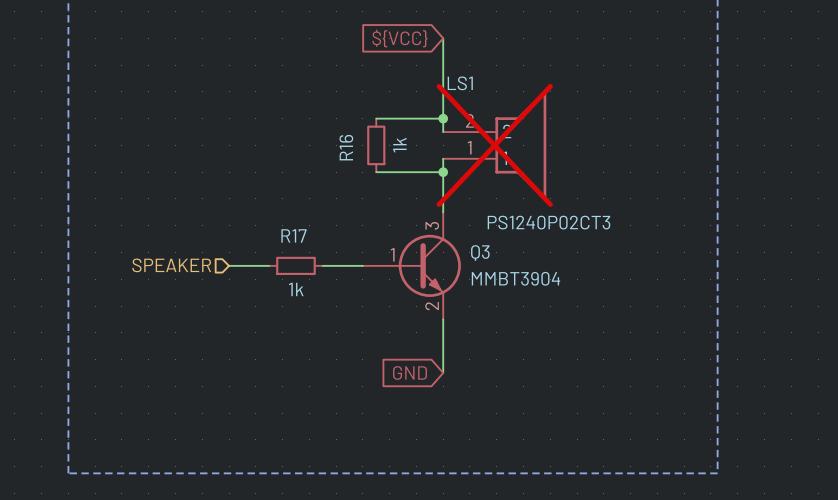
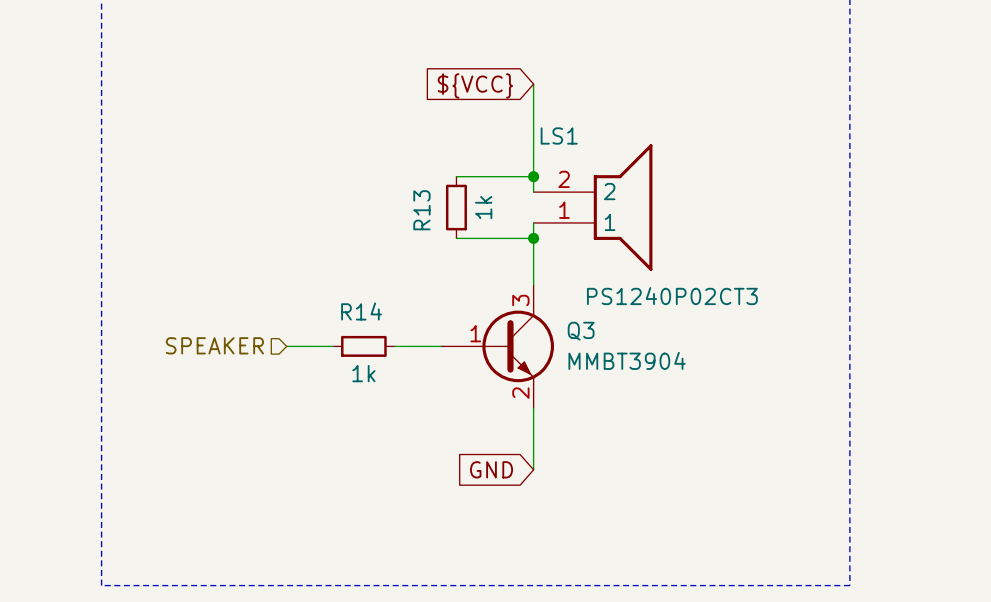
LS1 do-not-place cross: (494, 145) -> none
R16 name: R16 (346, 147) -> R13 (421, 210)
R17 name: R17 (293, 235) -> R14 (361, 311)

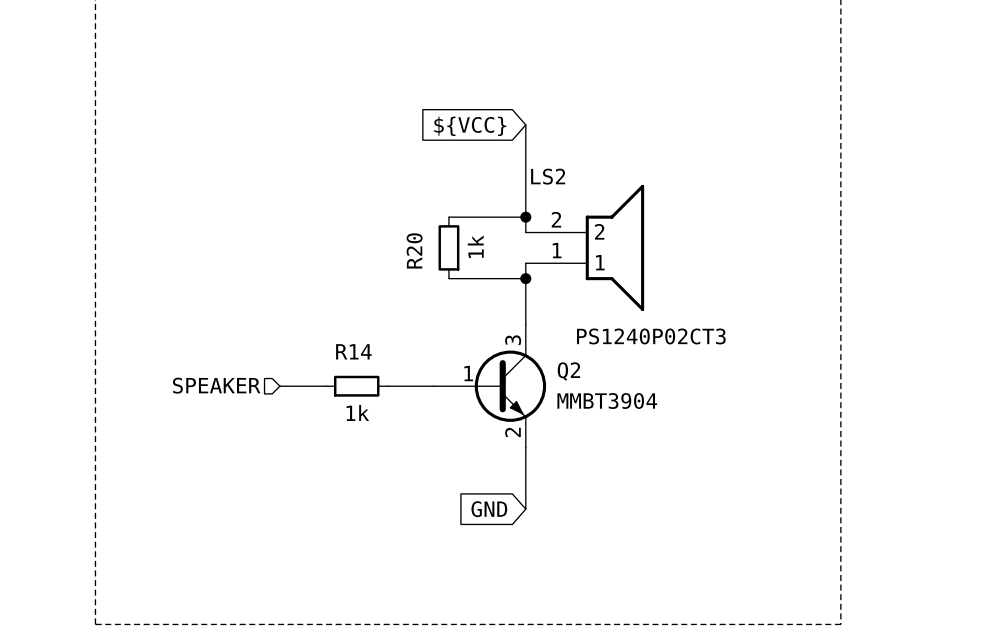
LS1 name: LS1 (559, 135) -> LS2 (548, 176)
R13 name: R13 (421, 210) -> R20 (414, 250)
Q3 name: Q3 (581, 331) -> Q2 (568, 371)

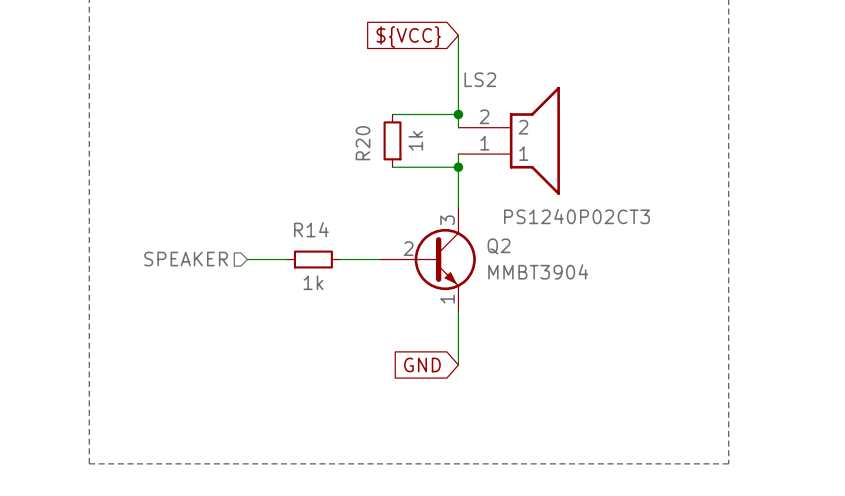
Q2 pin number: 1 (468, 373) -> 2 (408, 248)
Q2 pin number: 2 (512, 432) -> 1 (447, 299)

